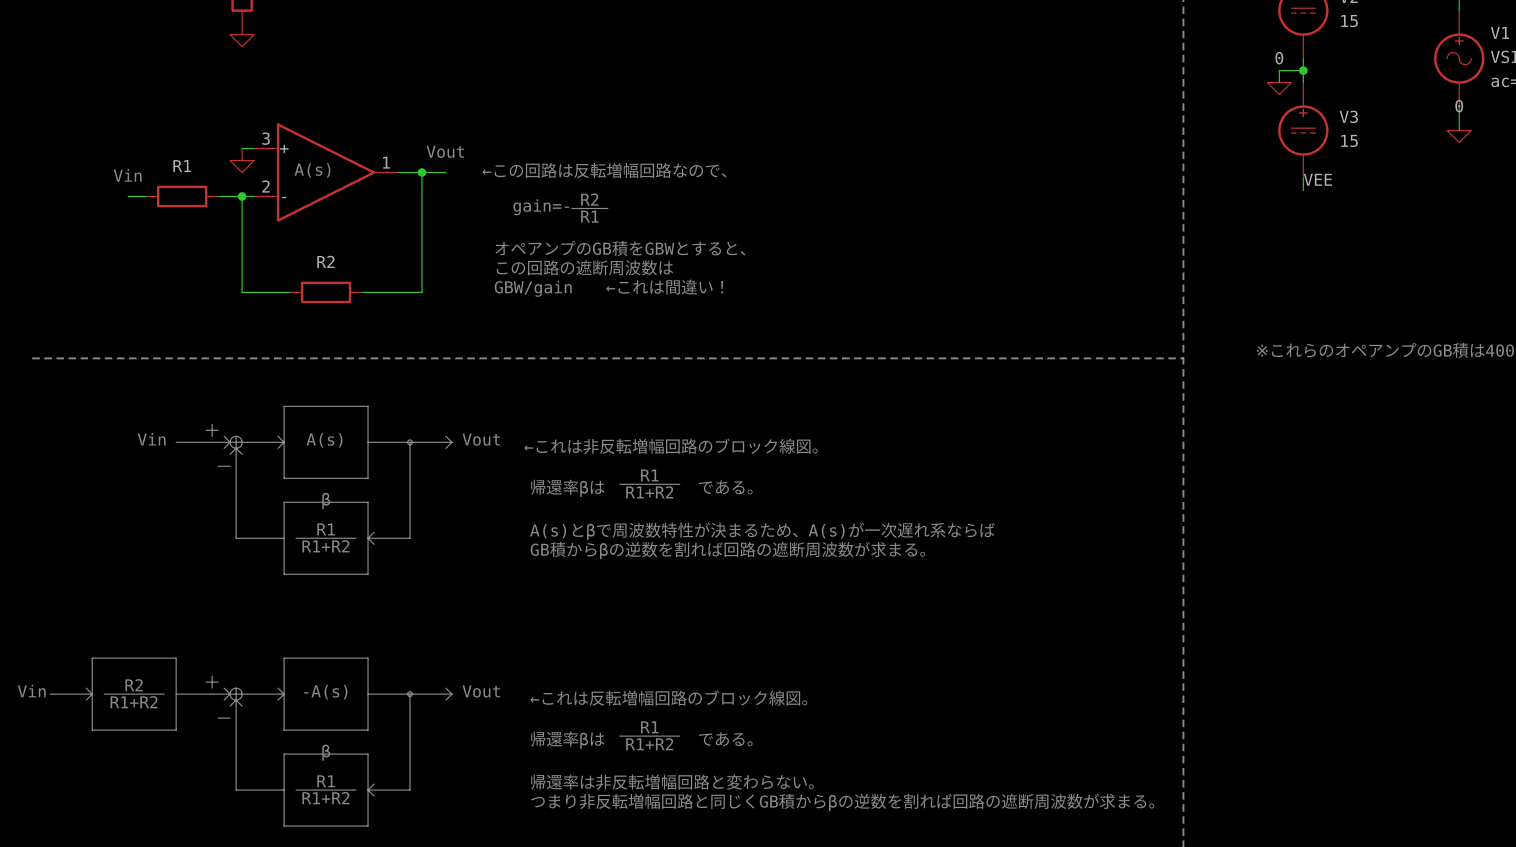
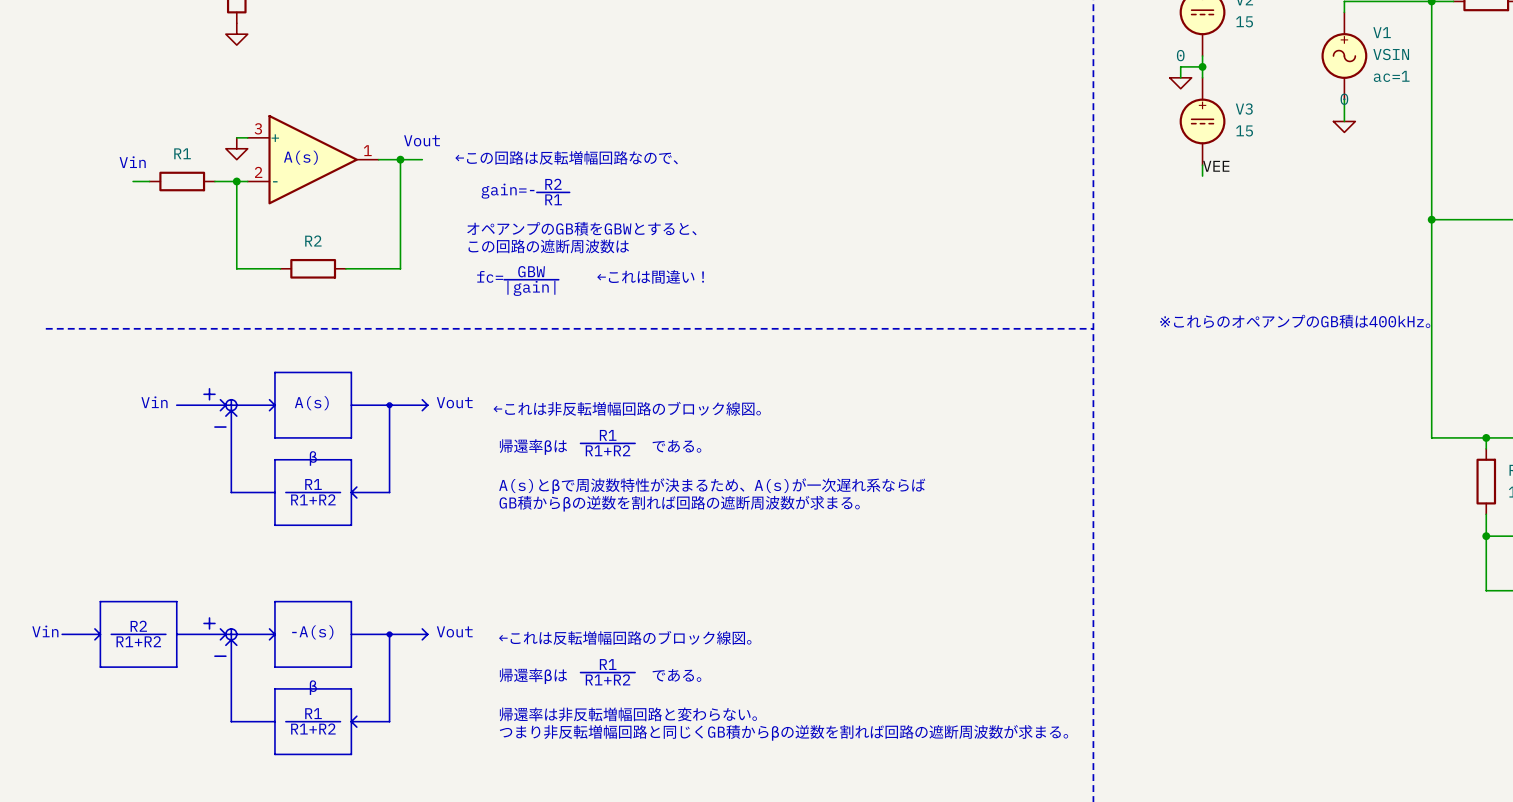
text: GBW/gain ←これは間違い！ (608, 288) -> ←これは間違い！ (650, 276)
text: none -> GBW (531, 271)
text: none -> fc= (490, 276)
line: none -> (504, 279) (558, 279)
text: none -> |gain| (531, 288)

